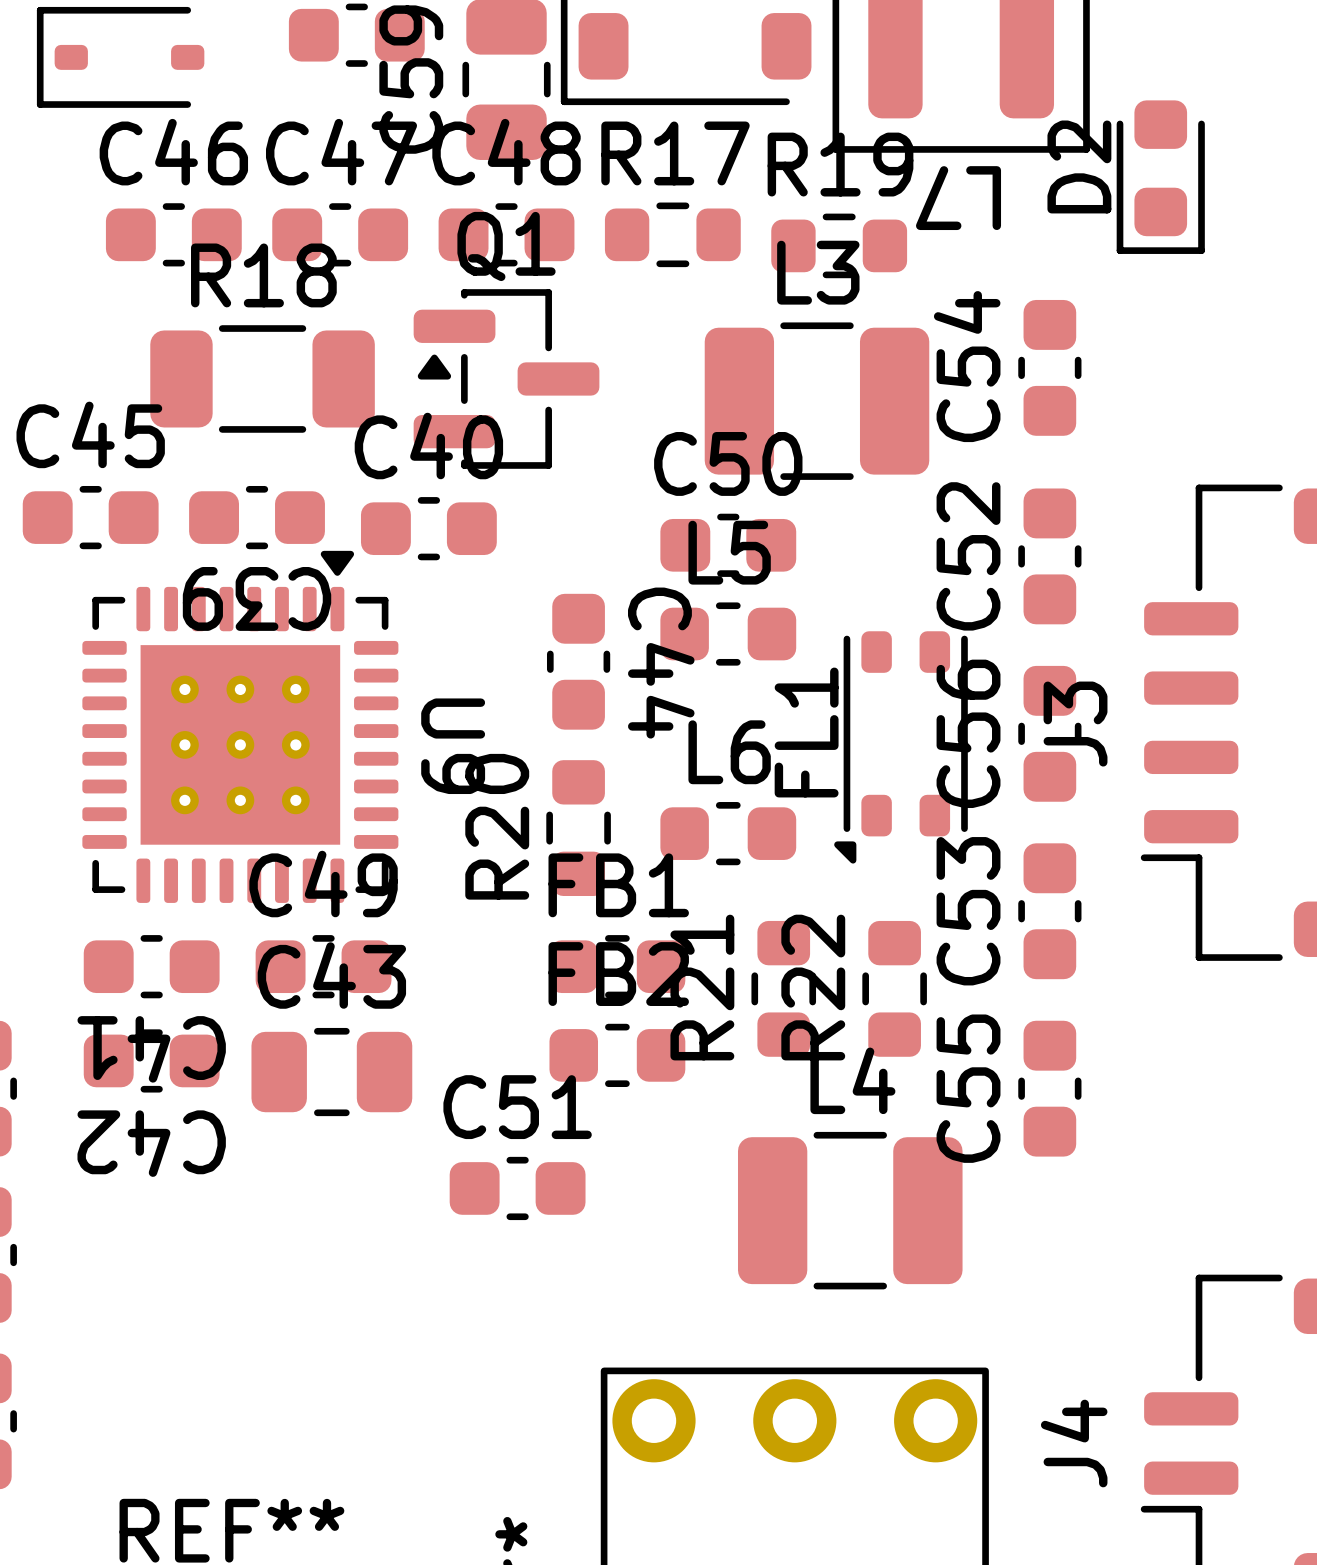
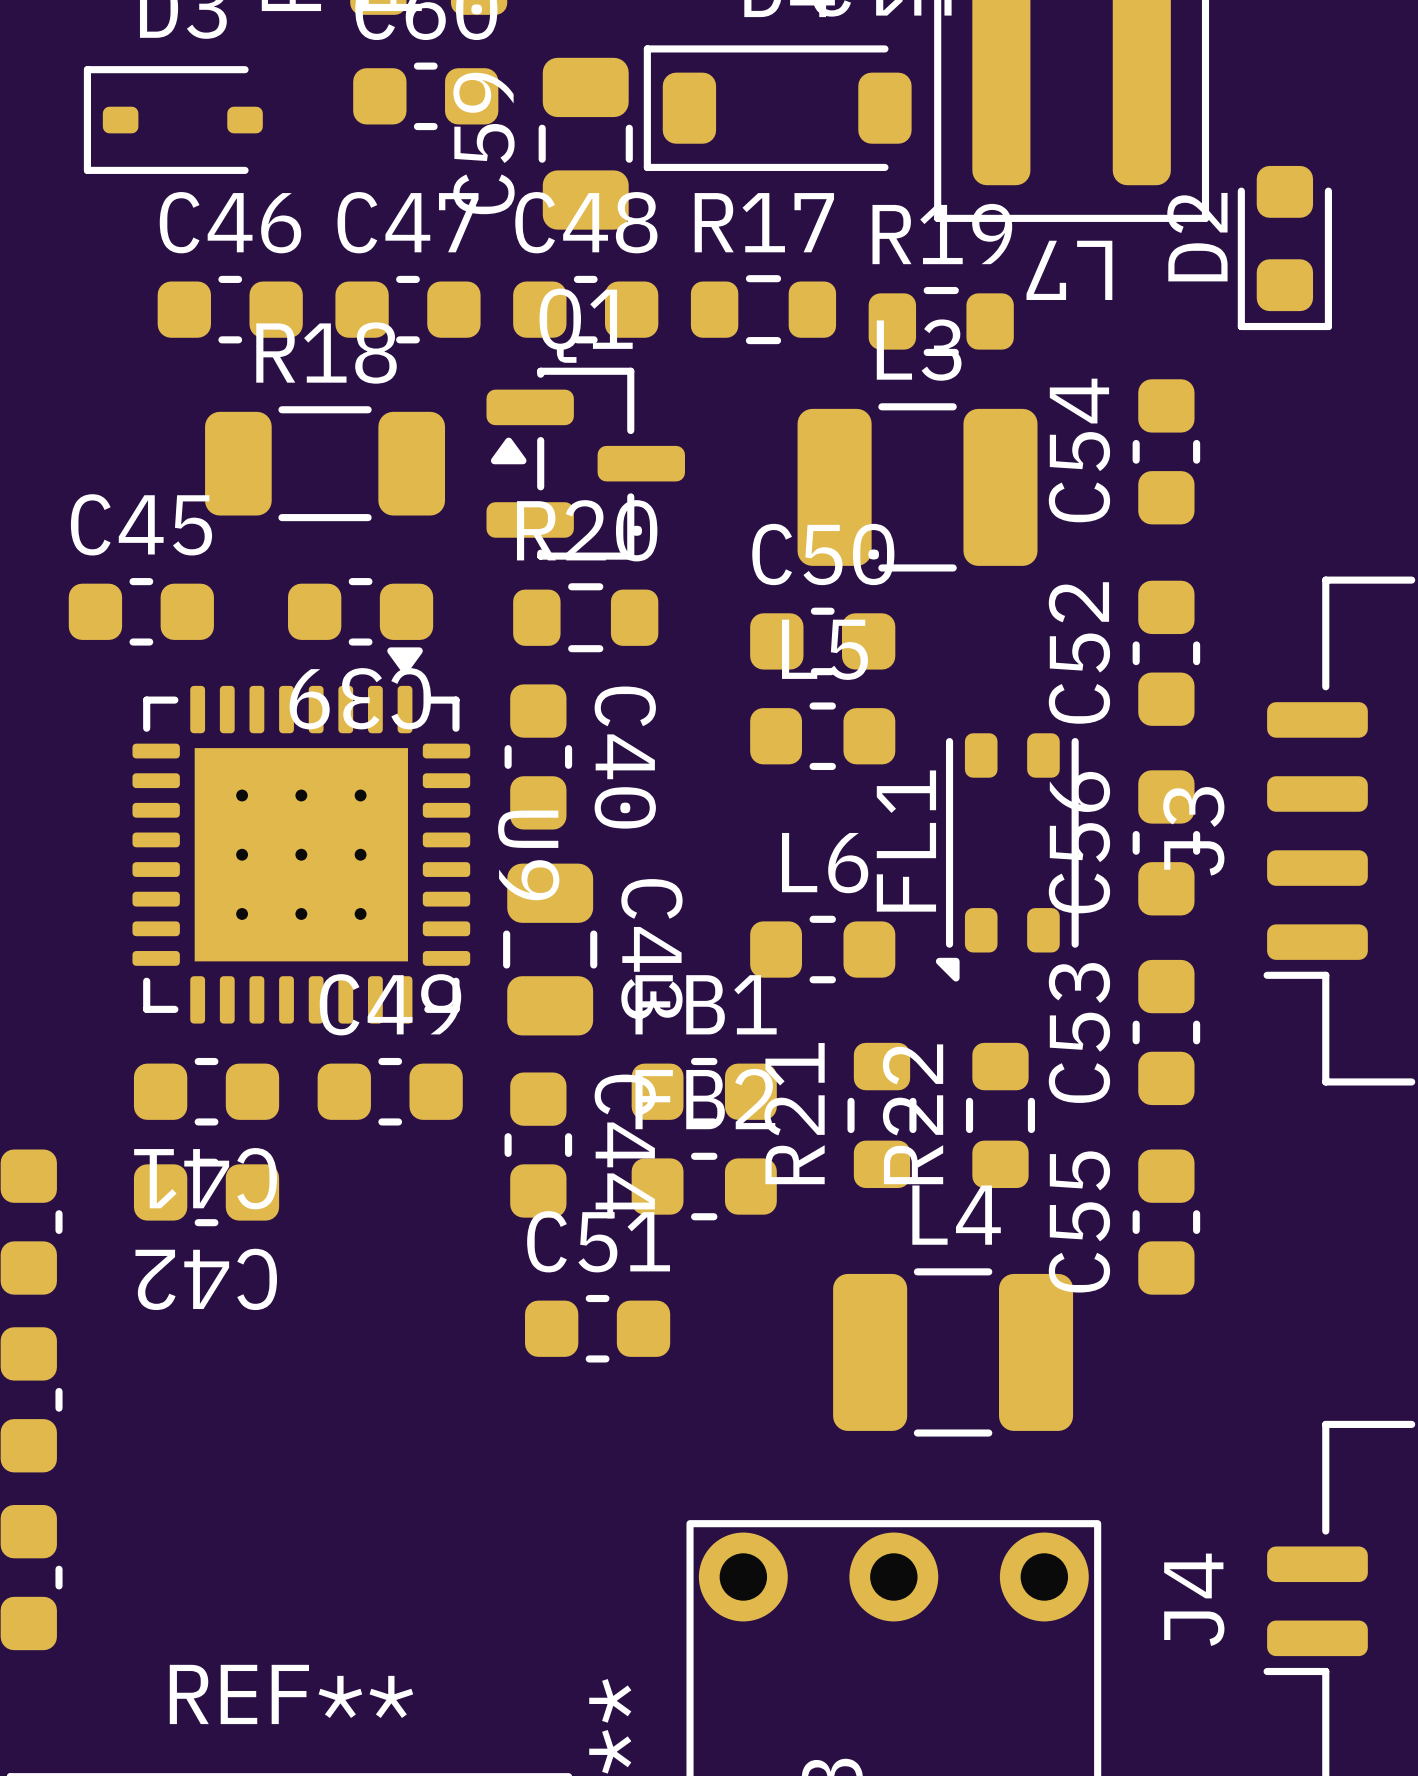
C39 position: (257, 517) -> (360, 611)
C40 rotation: 0° (428, 528) -> 90° clockwise (538, 756)
C40 position: (428, 528) -> (538, 756)
C44 position: (578, 661) -> (538, 1145)
R20 rotation: 0° (578, 828) -> 90° clockwise (585, 617)
R20 position: (578, 828) -> (585, 617)
C43 rotation: 0° (331, 1072) -> 90° clockwise (550, 949)
C43 position: (331, 1072) -> (550, 949)

